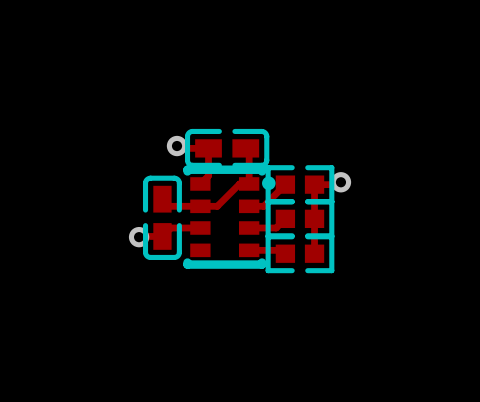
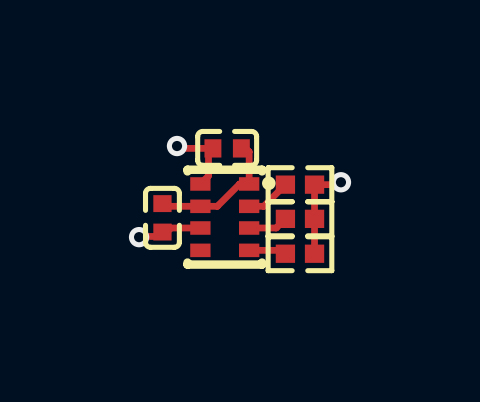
part footprint: [184, 128, 270, 168] -> [195, 128, 260, 168]
part footprint: [142, 175, 182, 261] -> [142, 185, 182, 250]

